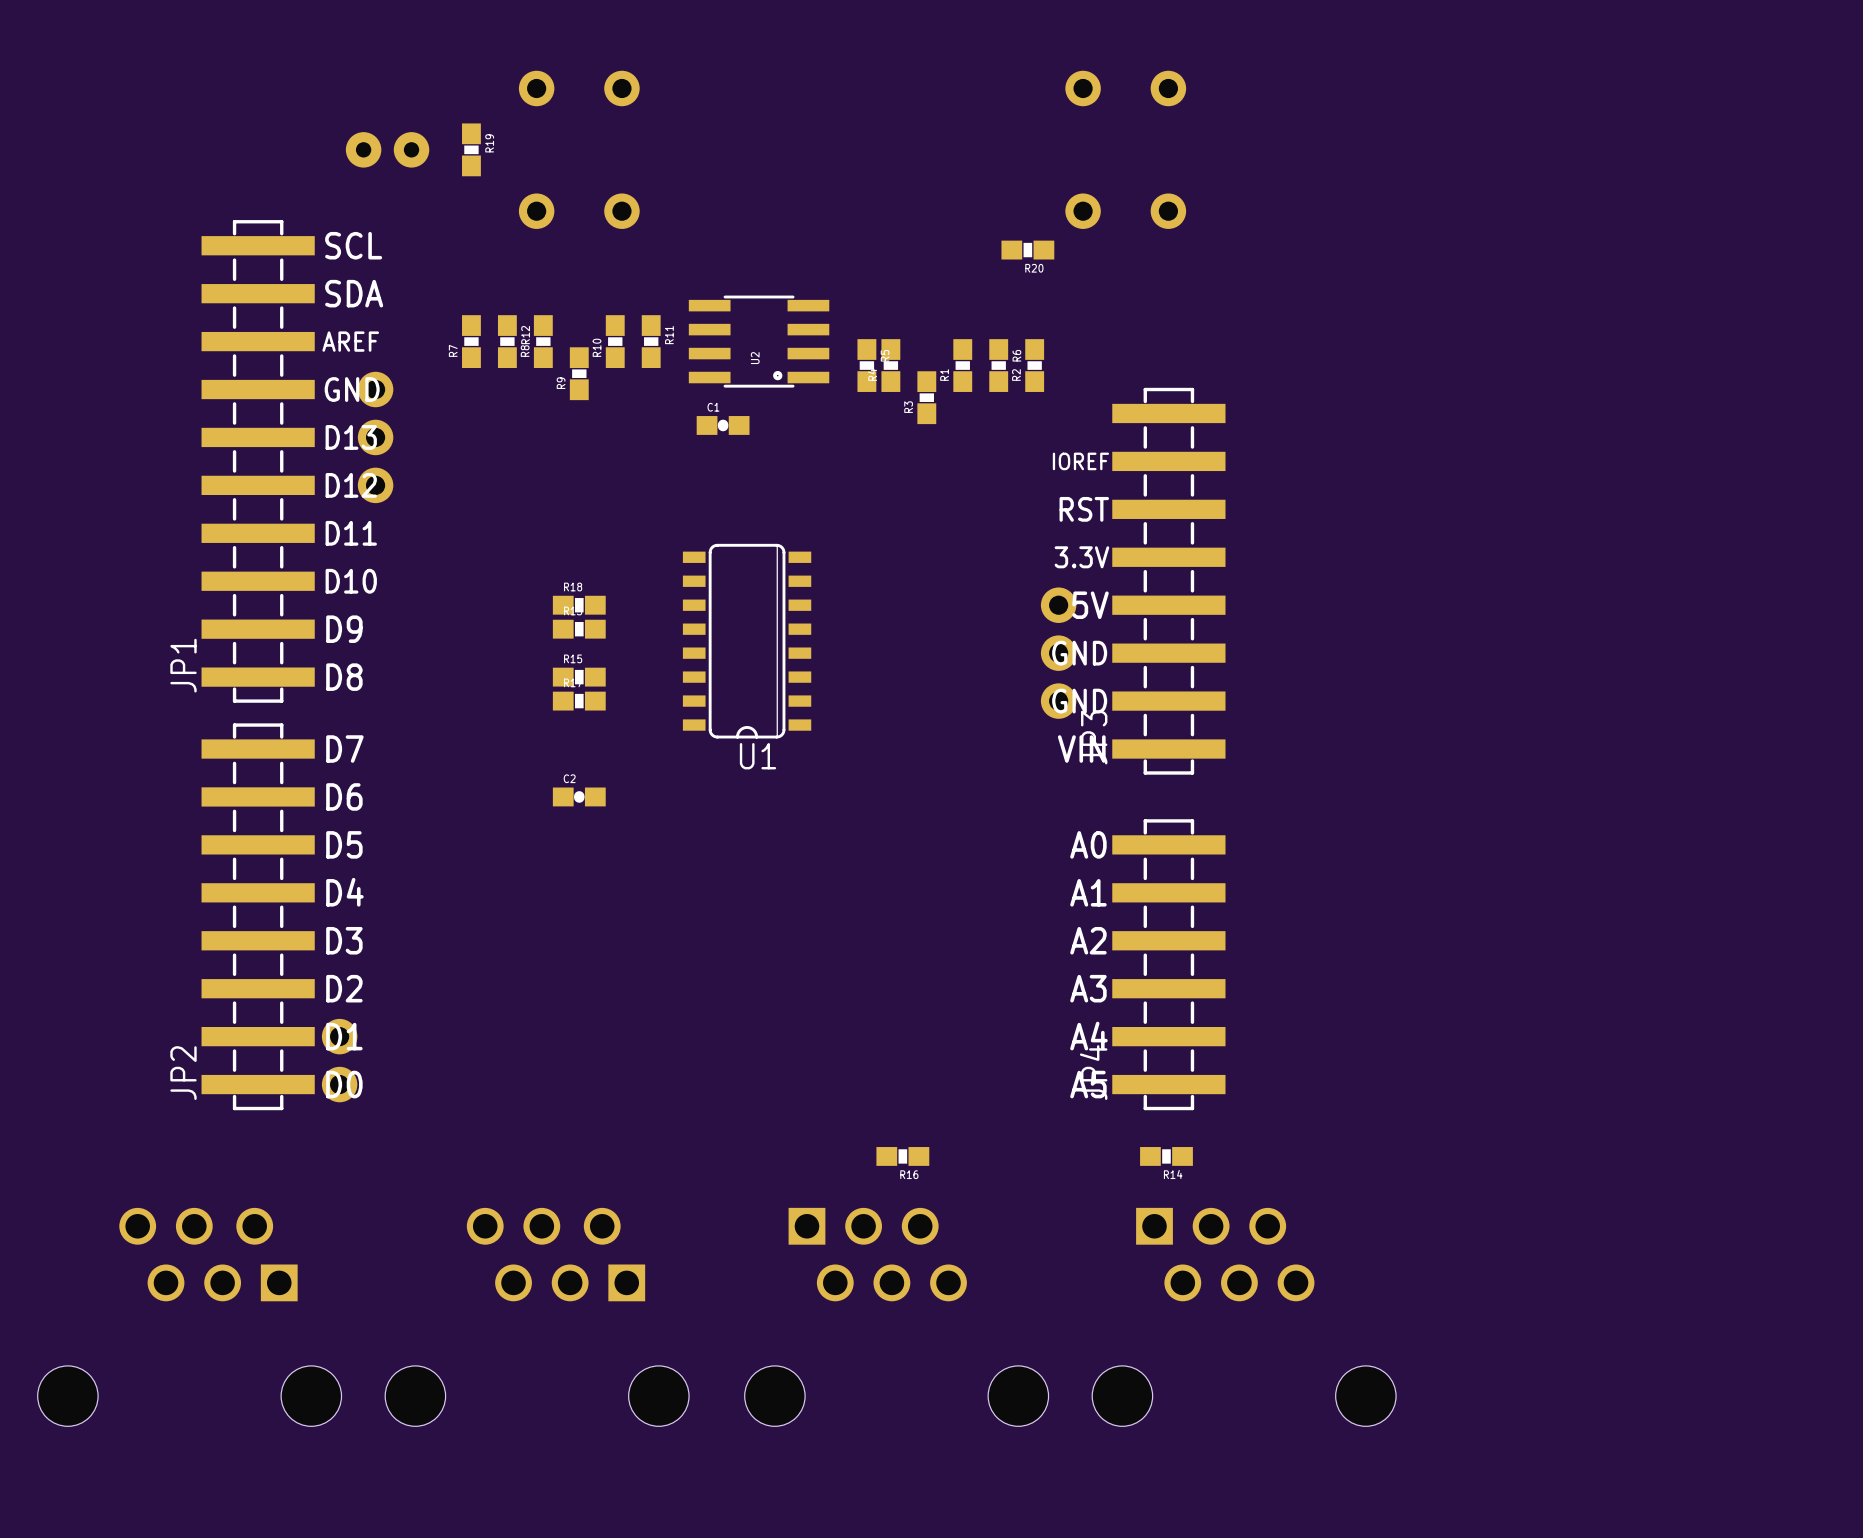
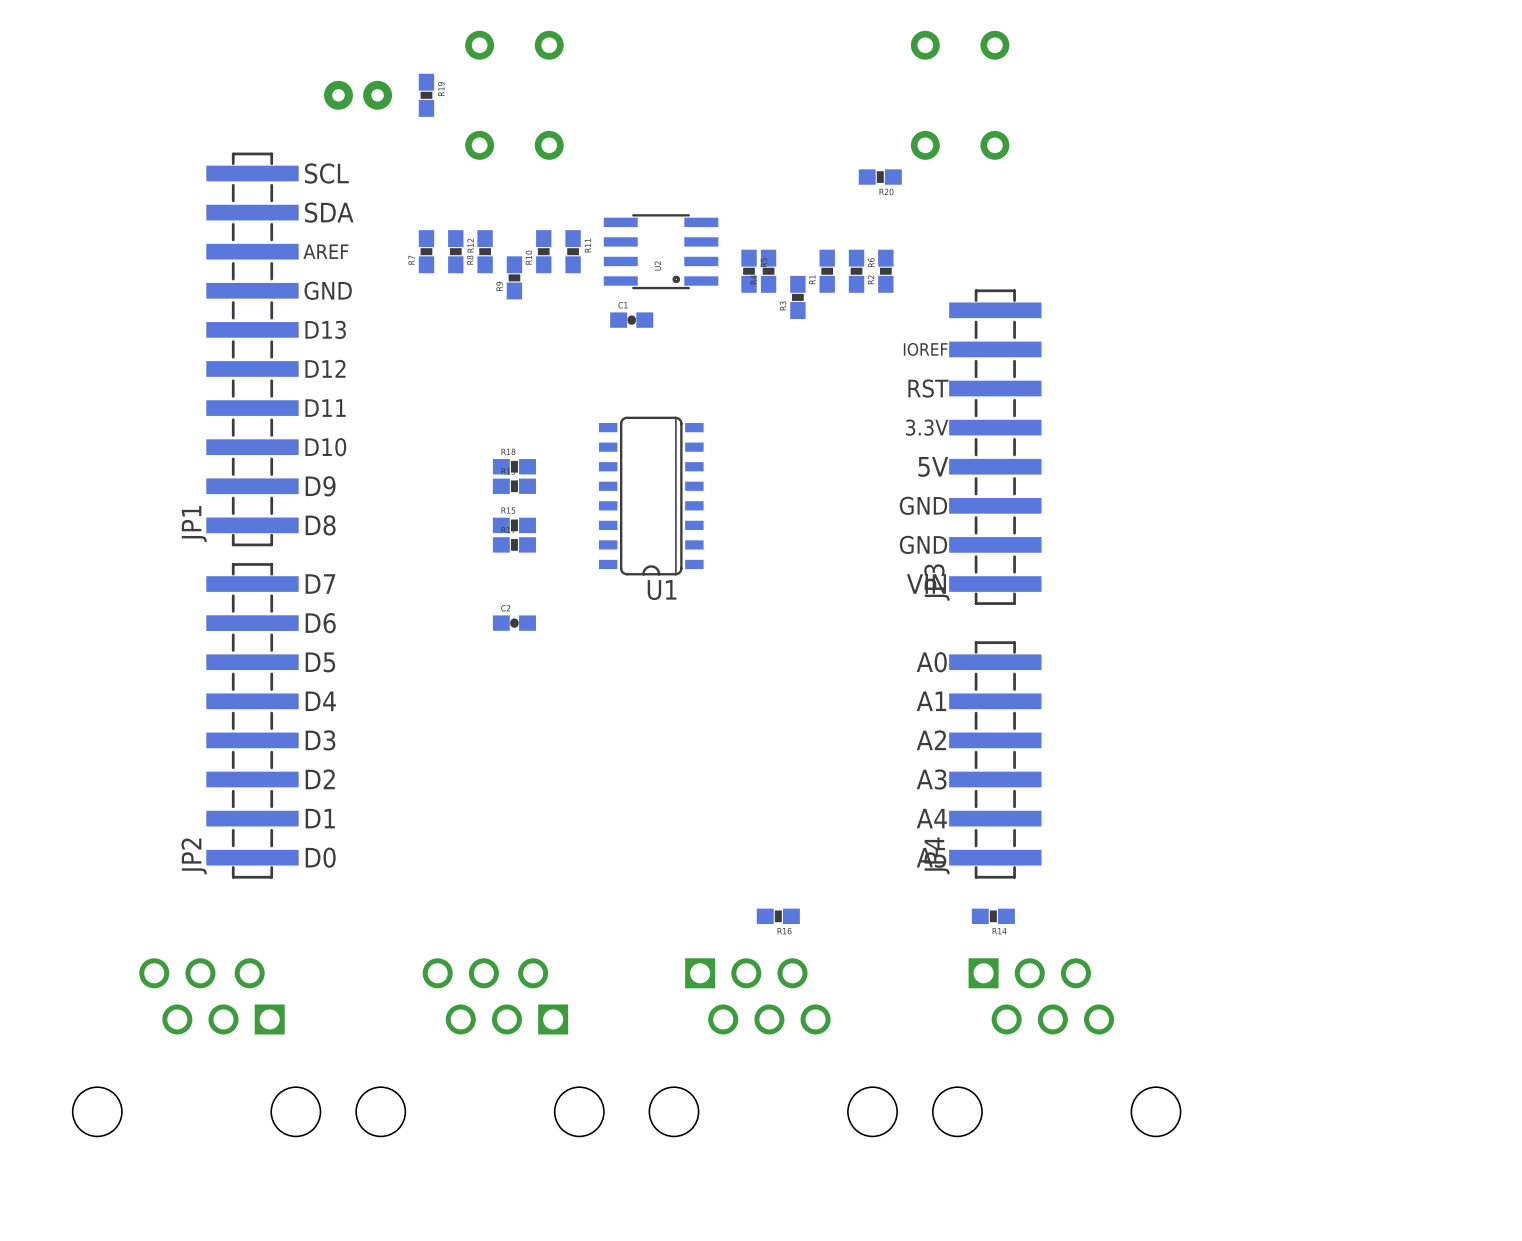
part: (375, 437) -> none
part: (1058, 653) -> none
part: (339, 1060) -> none

